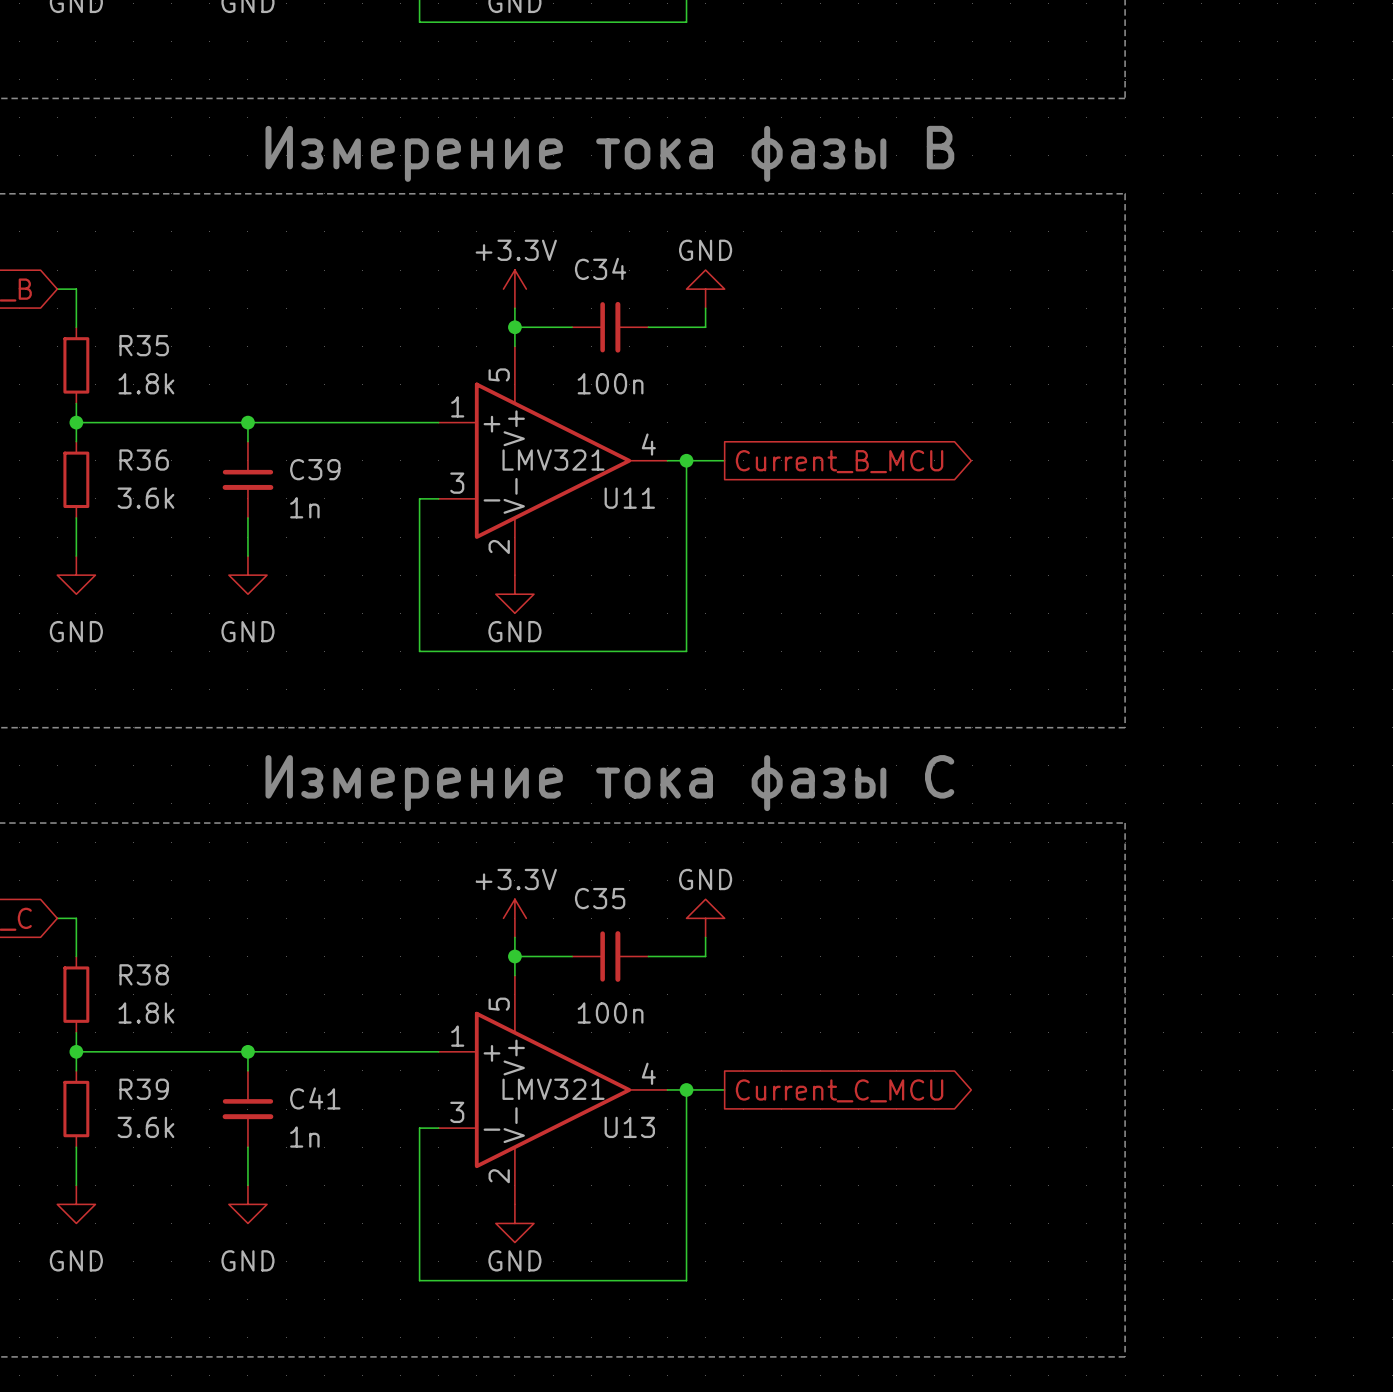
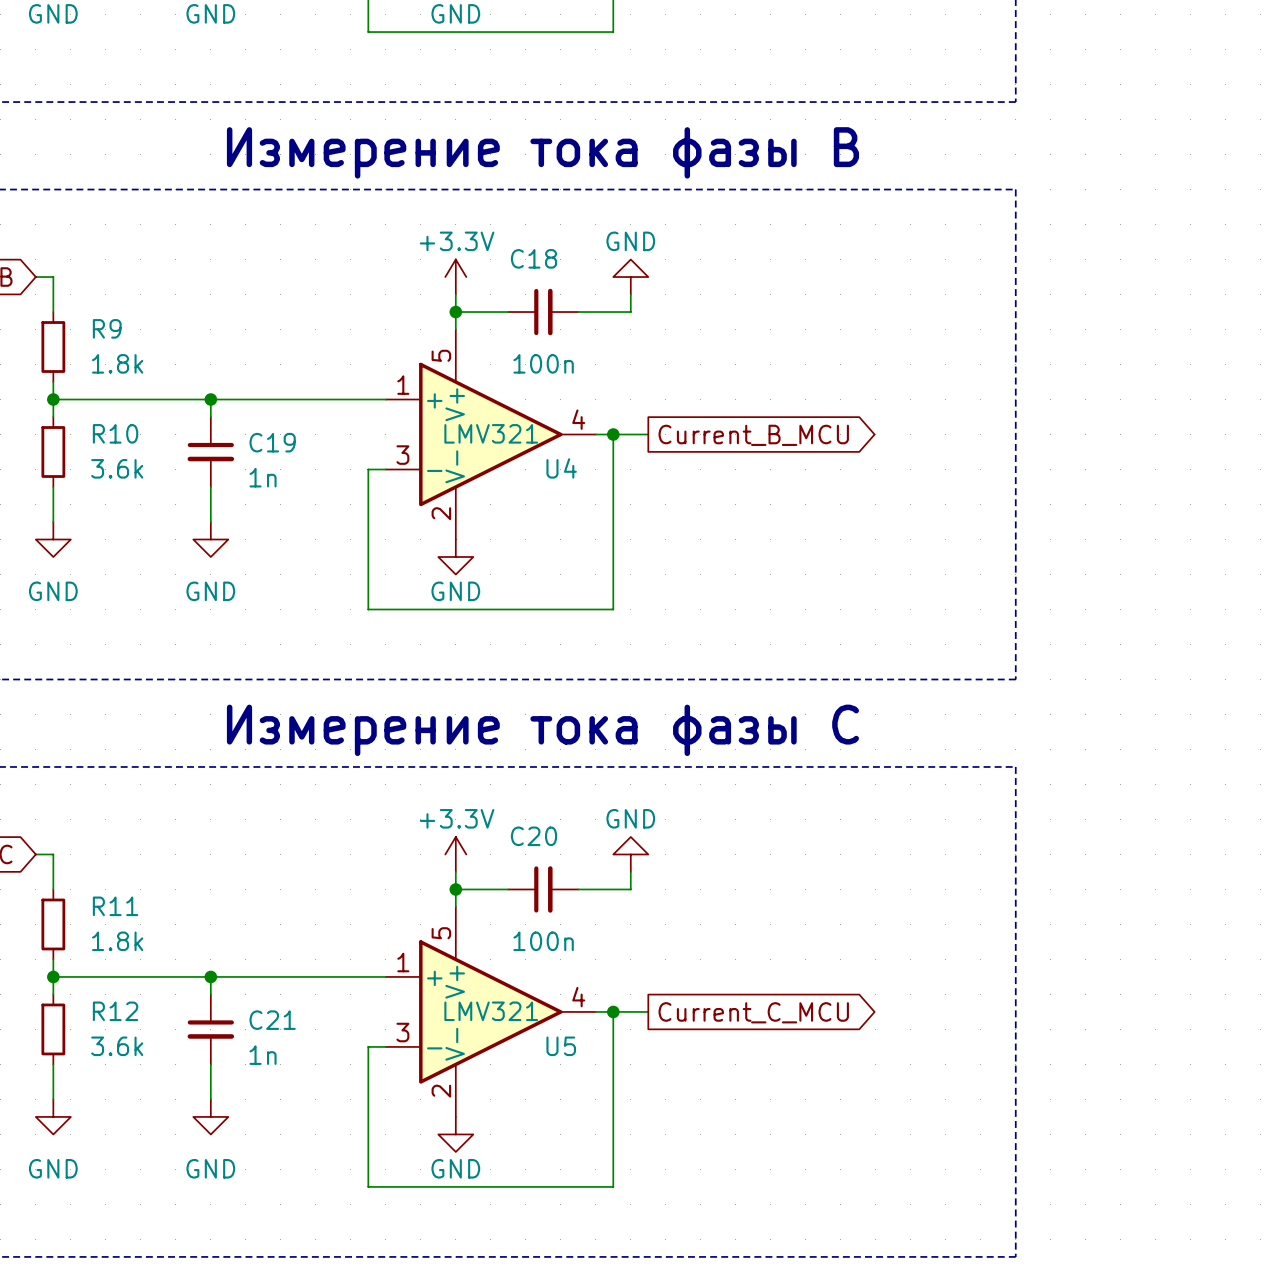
C34 name: C34 (600, 268) -> C18 (534, 258)
R35 name: R35 (144, 345) -> R9 (107, 328)
R36 name: R36 (144, 460) -> R10 (115, 433)
C39 name: C39 (315, 469) -> C19 (272, 442)
U11 name: U11 (629, 498) -> U4 (561, 468)
C35 name: C35 (600, 898) -> C20 (534, 836)
R38 name: R38 (144, 974) -> R11 (115, 906)
R39 name: R39 (144, 1089) -> R12 (115, 1011)
C41 name: C41 (315, 1098) -> C21 (272, 1020)
U13 name: U13 (629, 1127) -> U5 (561, 1046)

